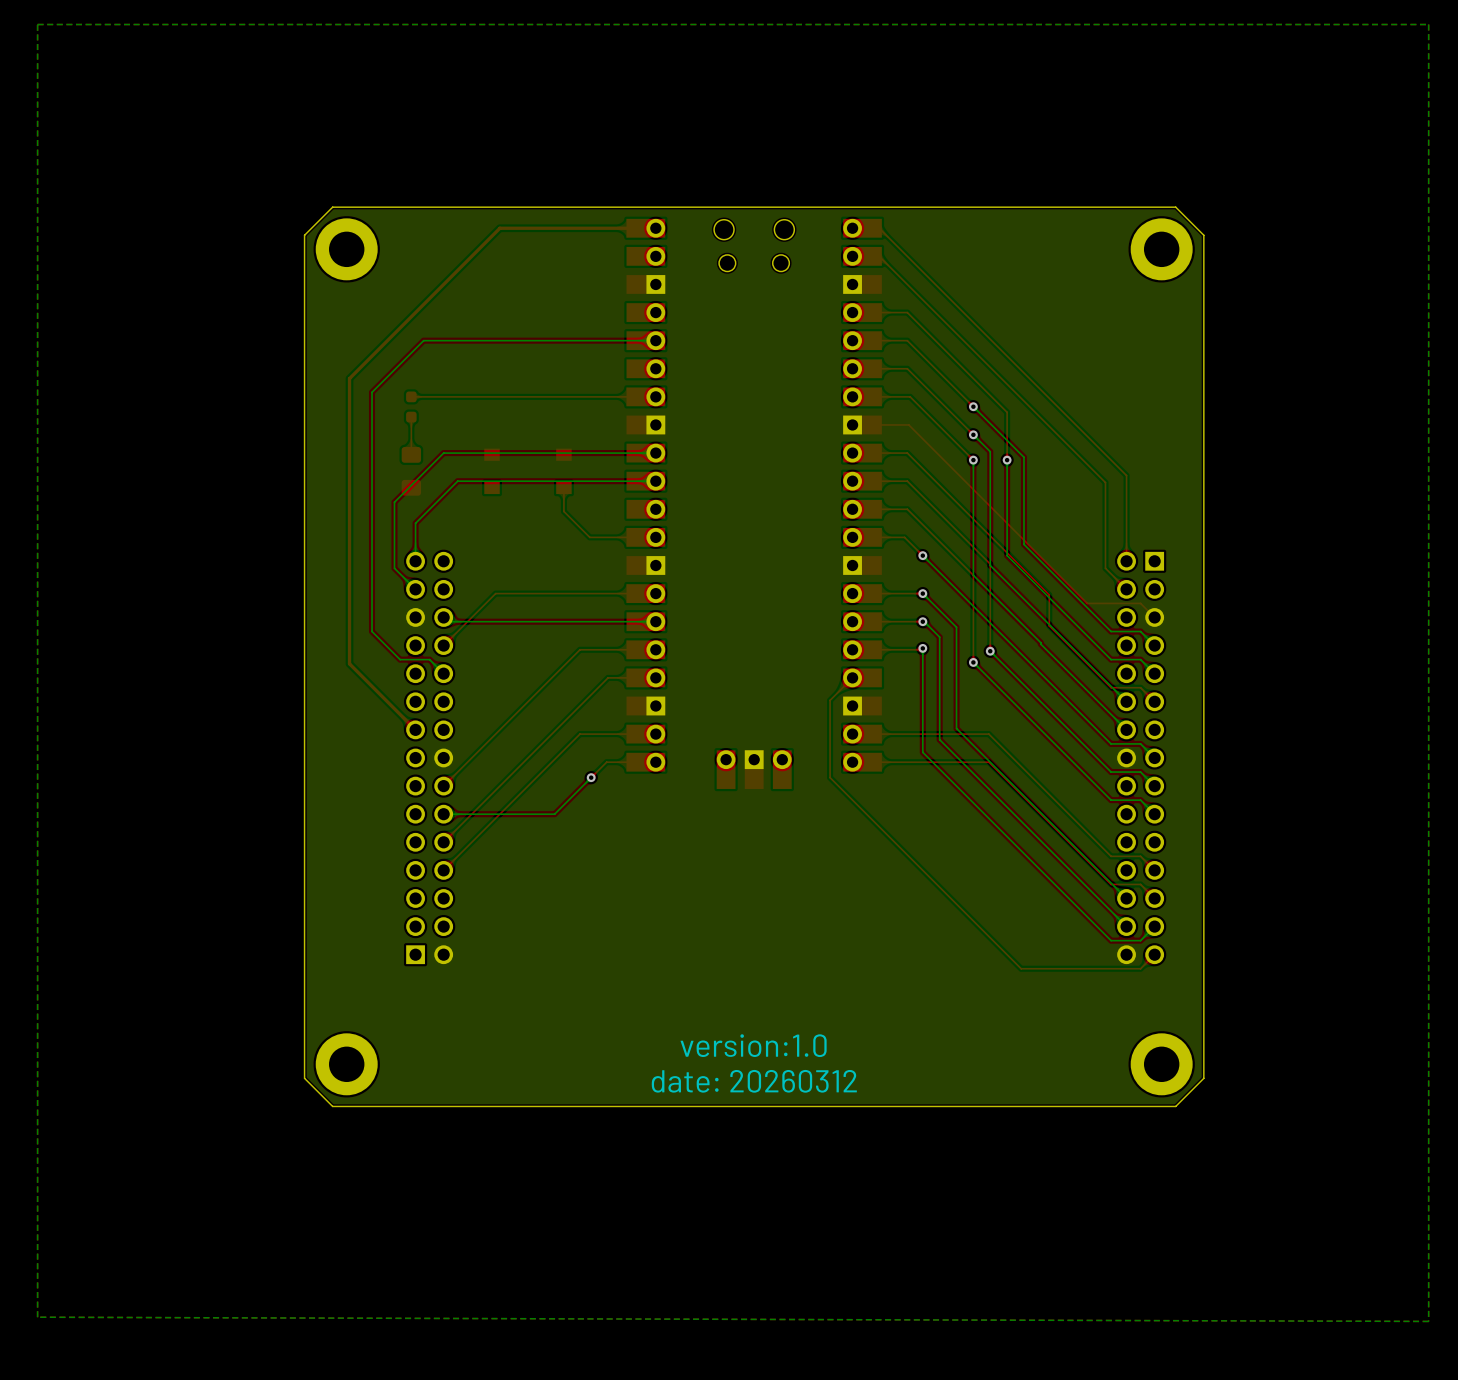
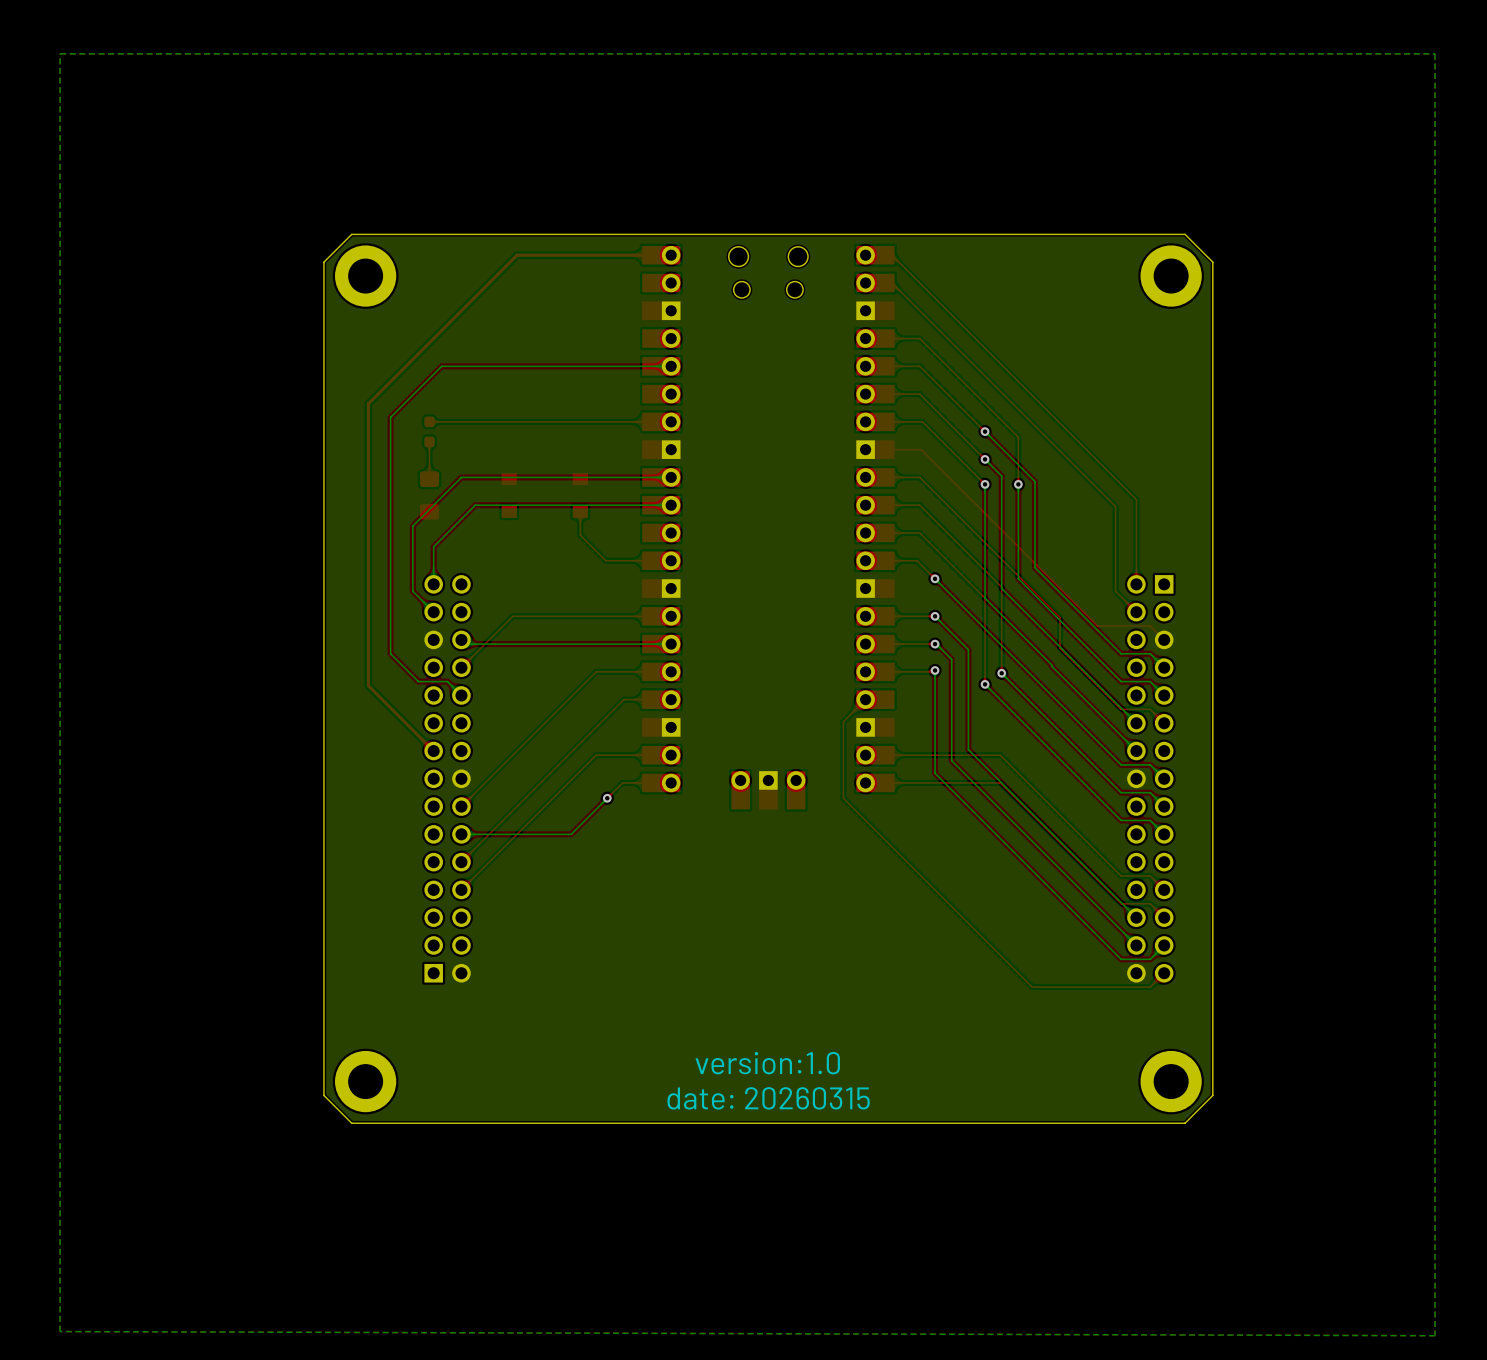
text: date: 20260312 (754, 1081) -> date: 20260315 (768, 1098)

